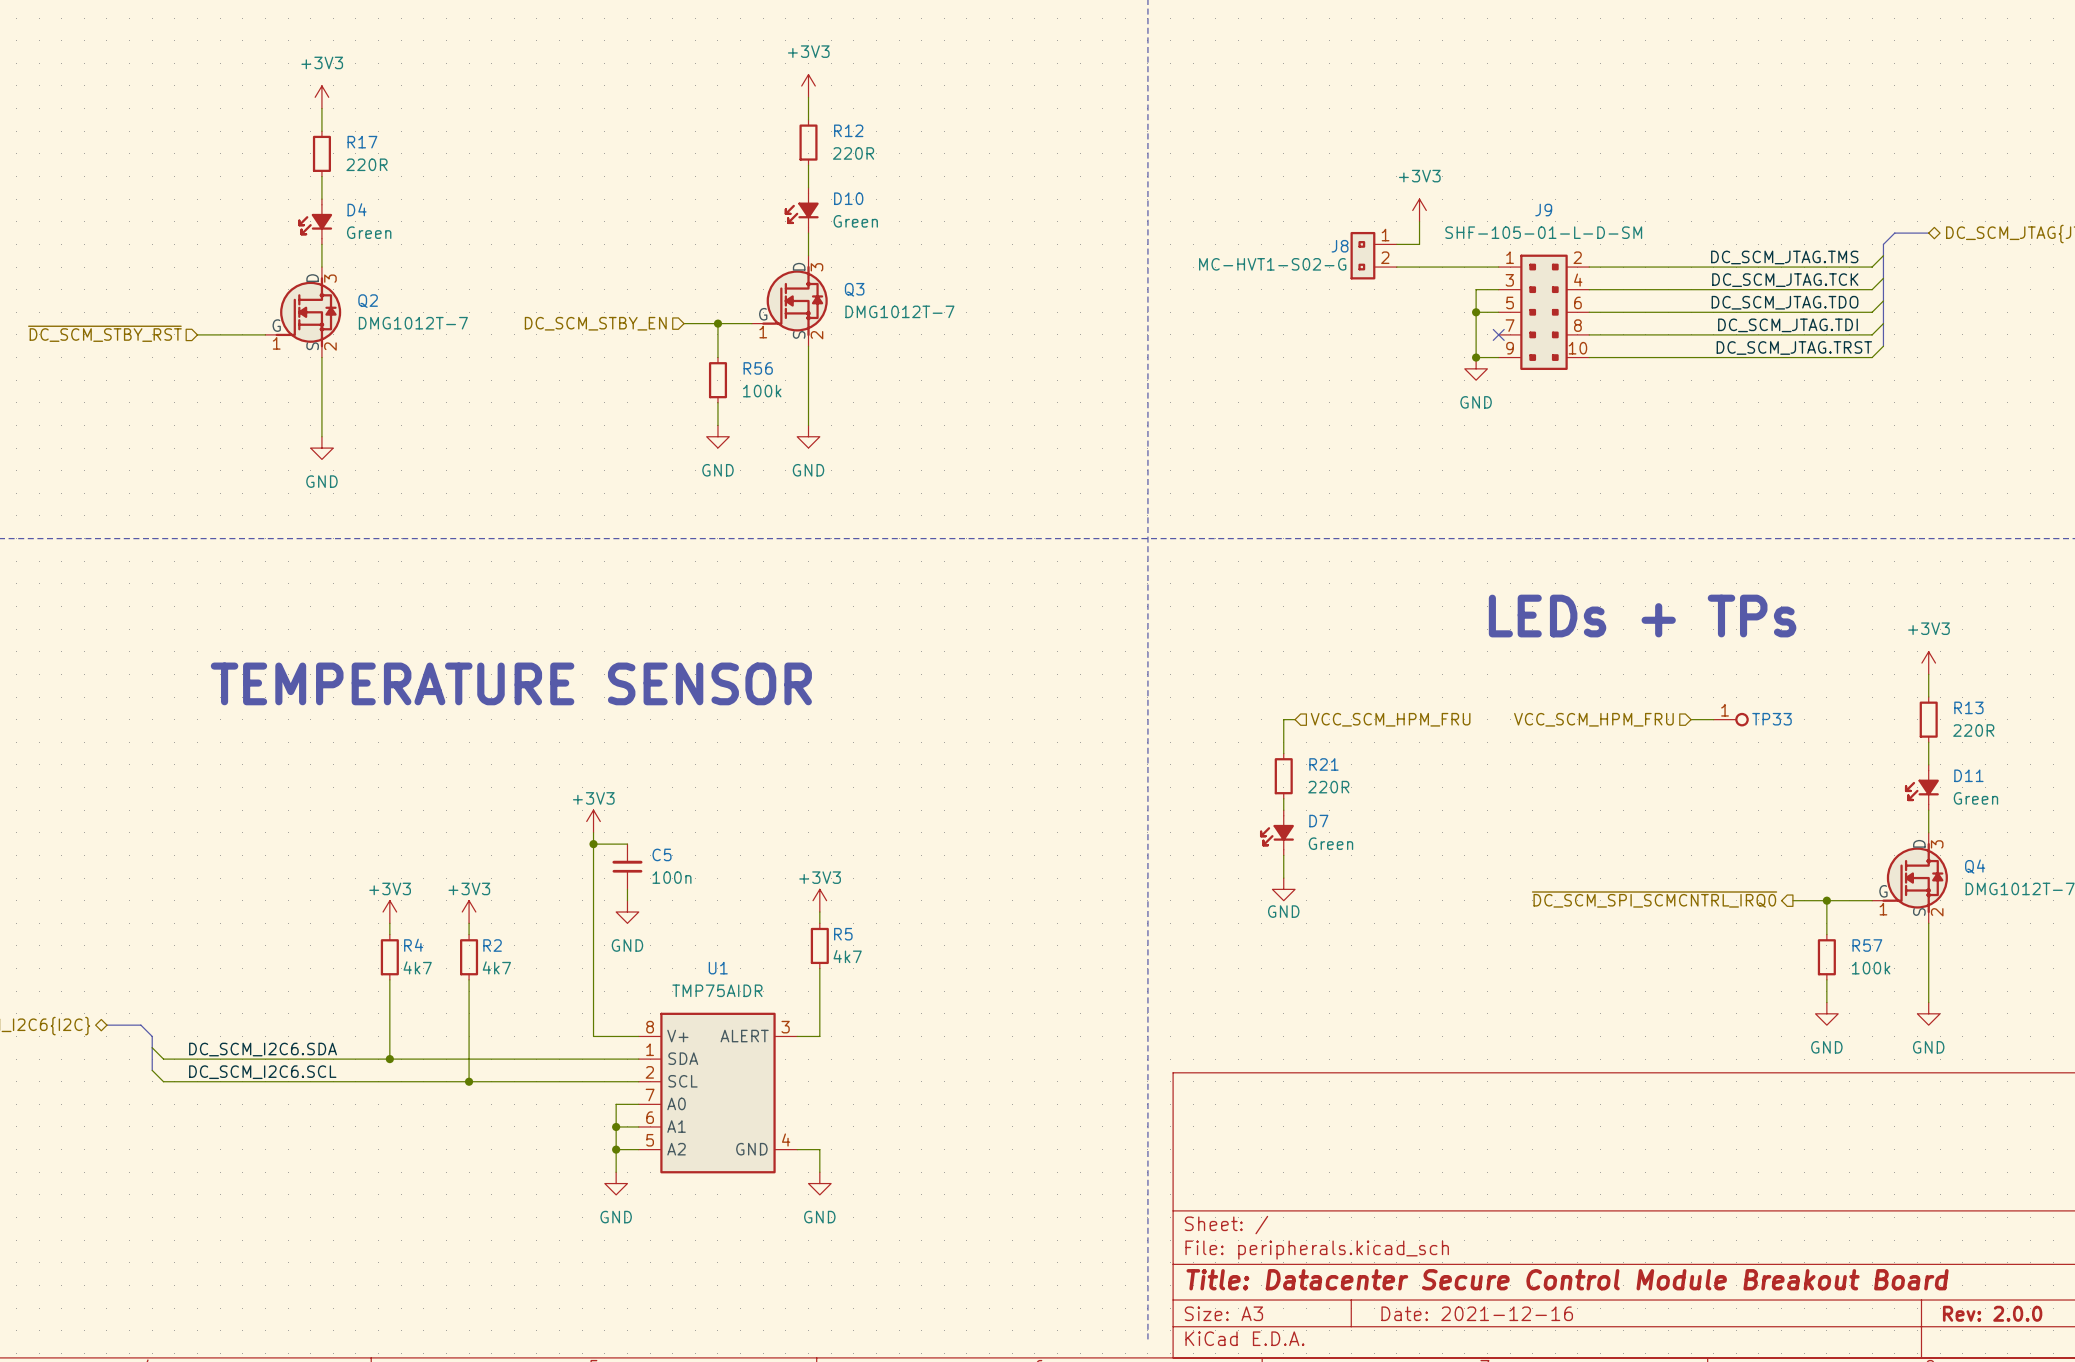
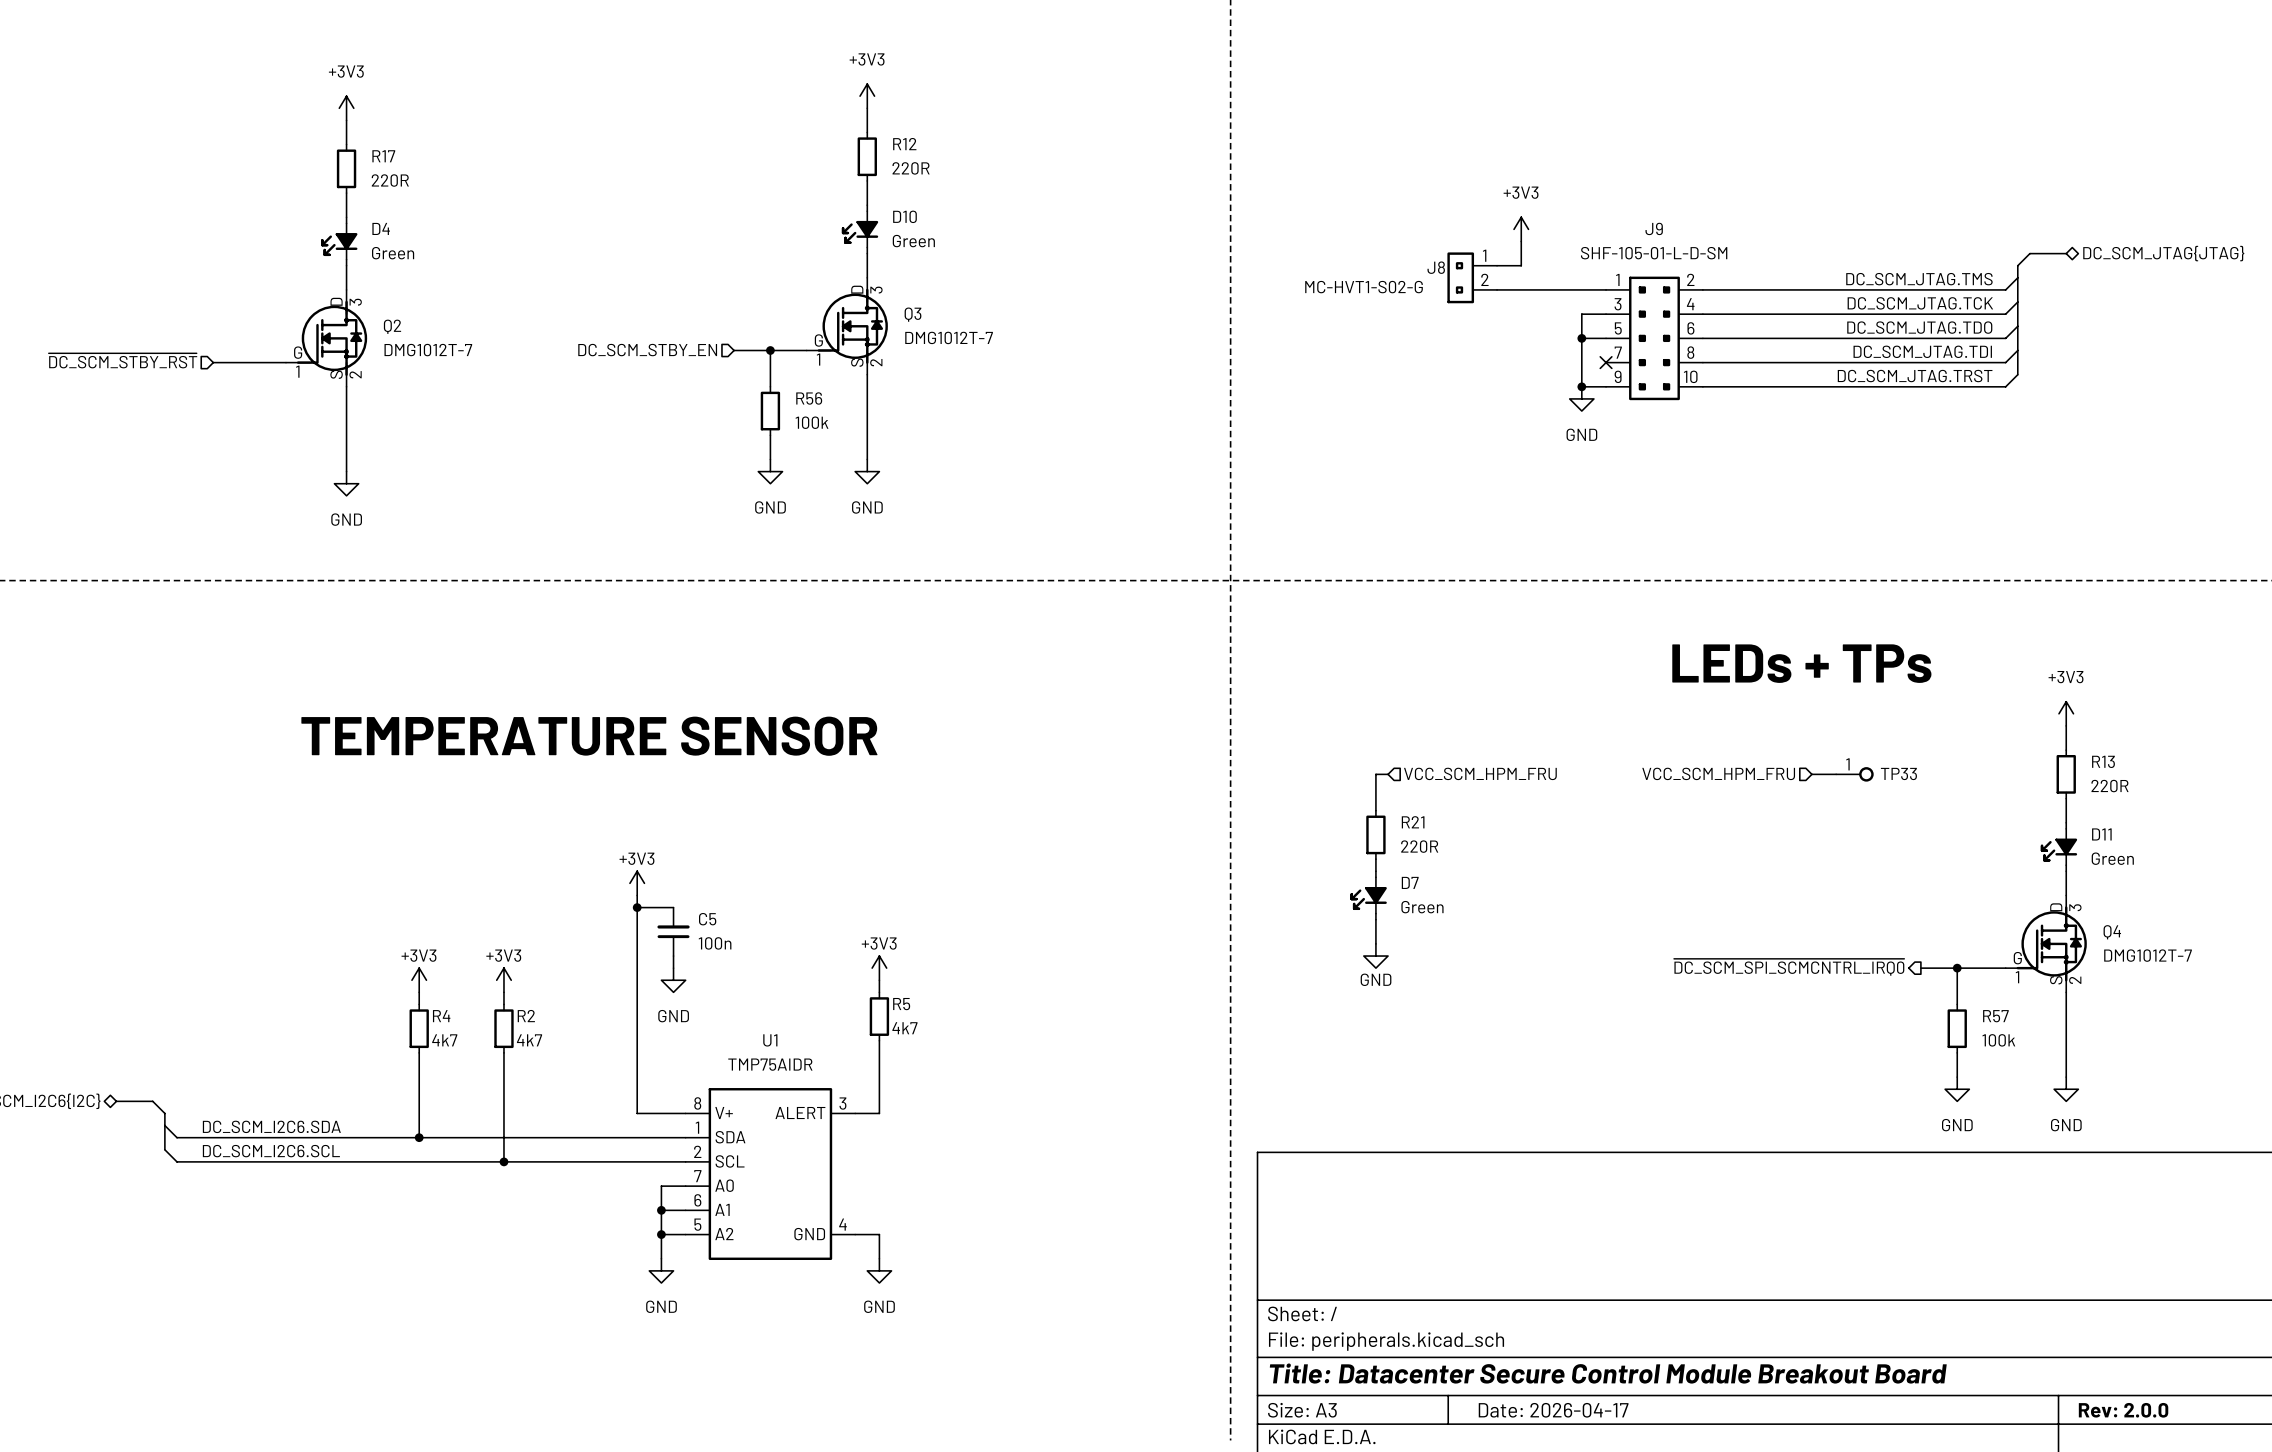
title block: Date: 2021-12-16 (1477, 1313) -> Date: 2026-04-17 (1553, 1410)

